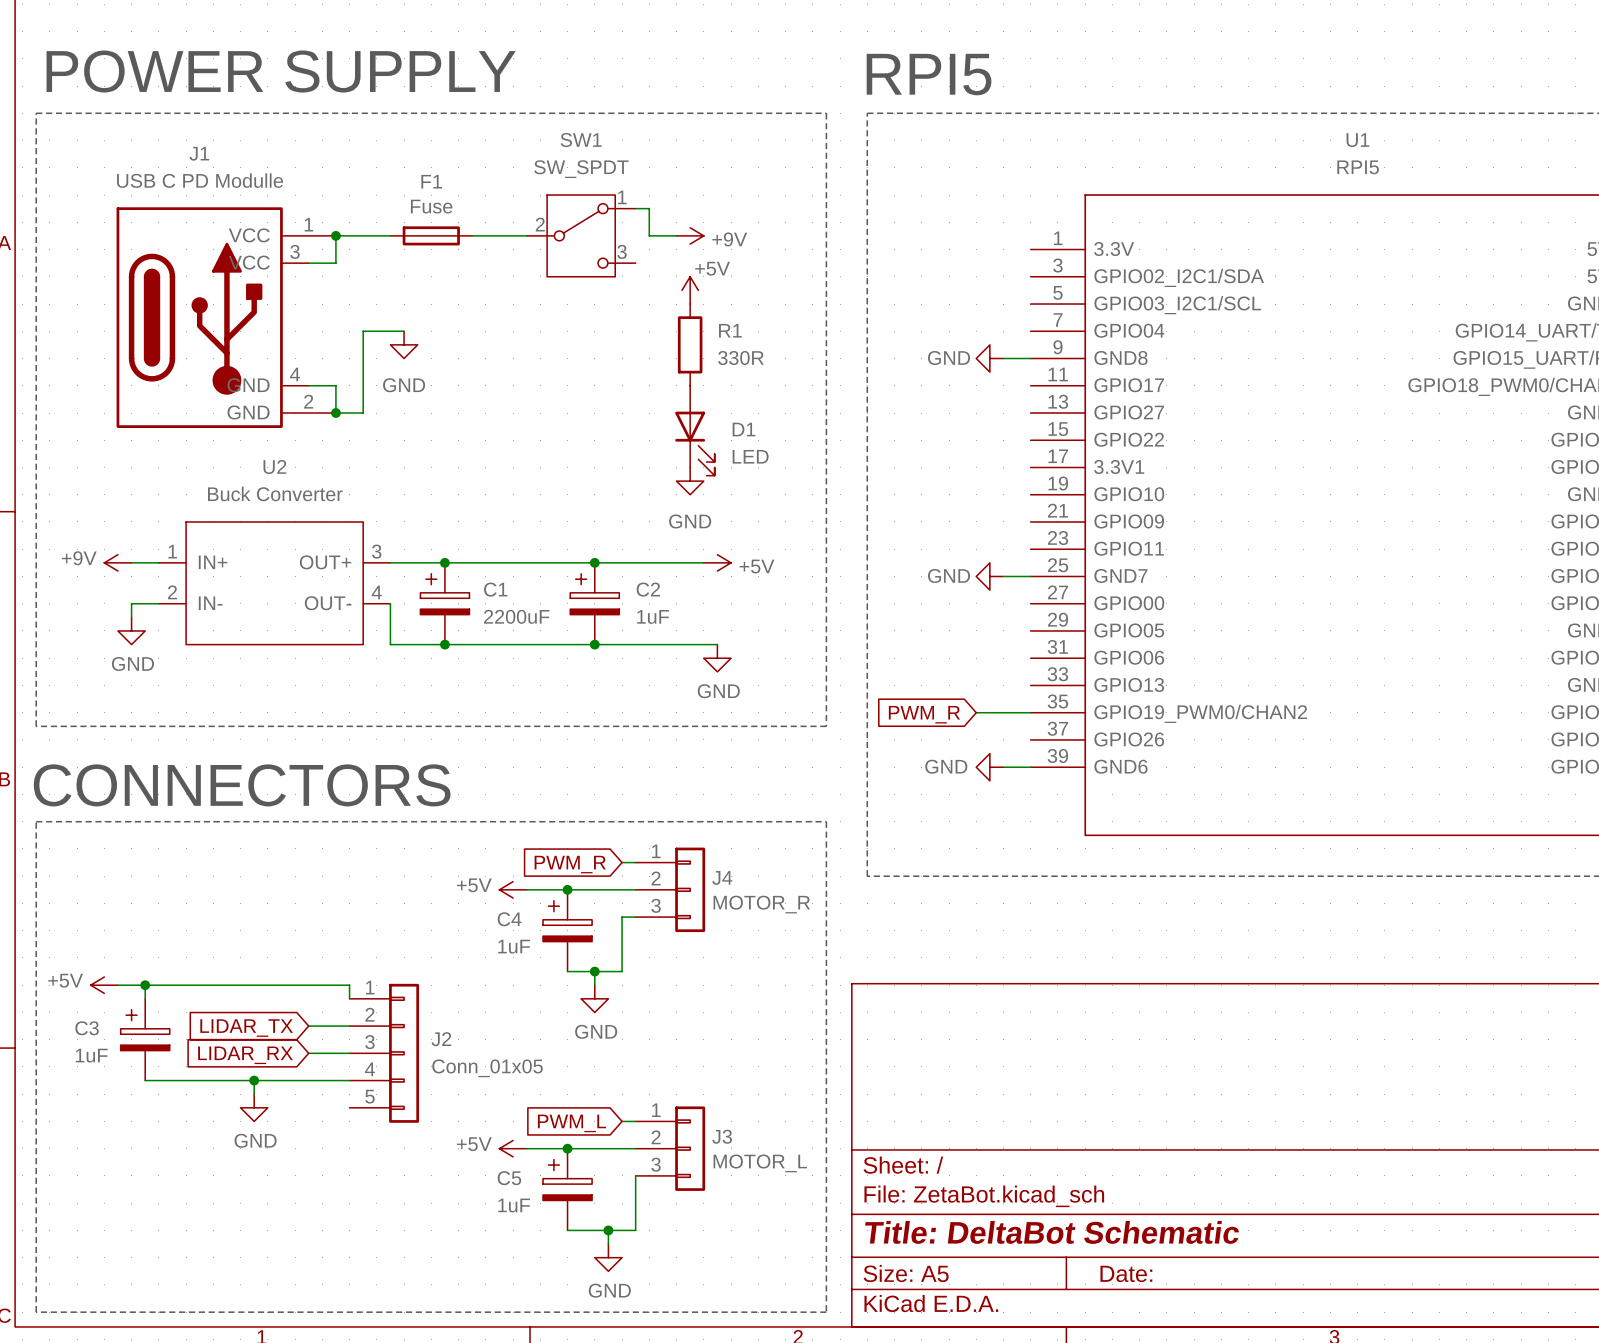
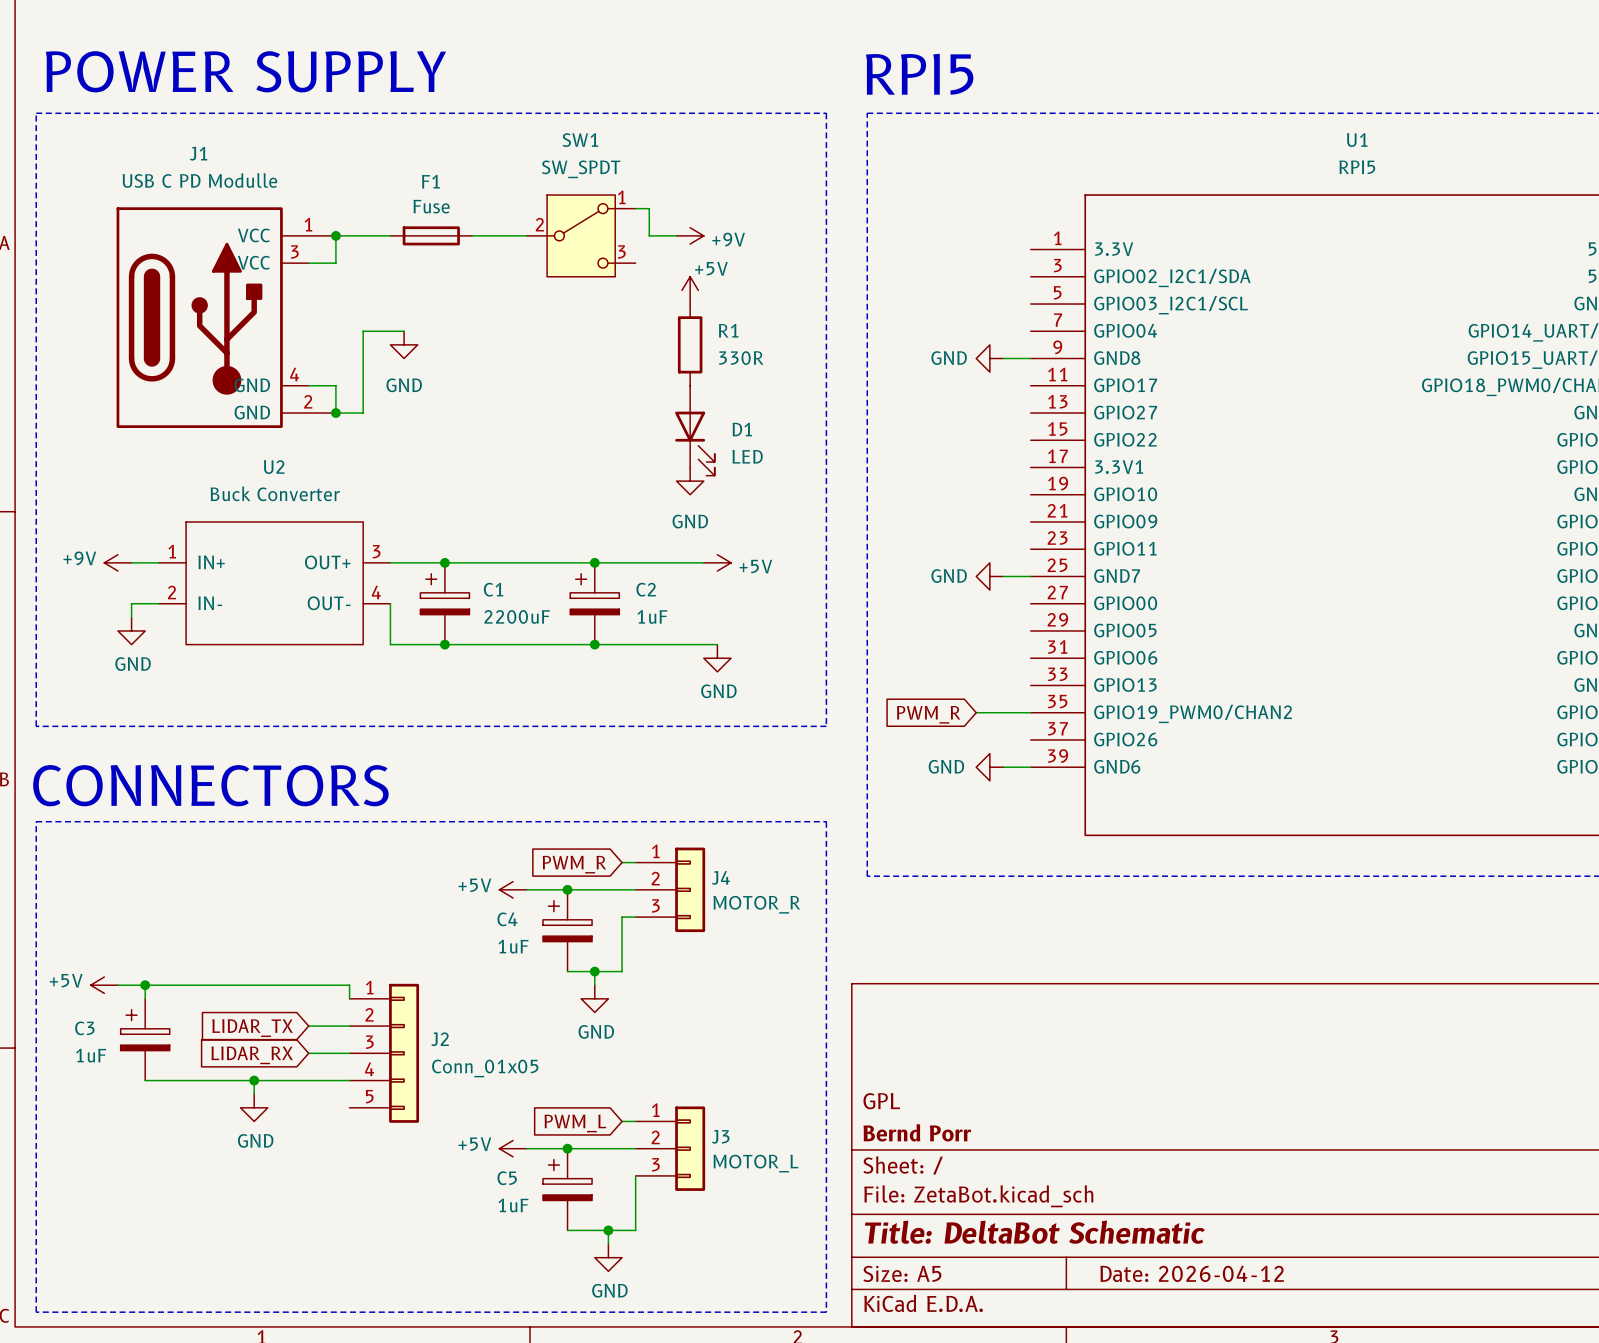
title block: none -> GPL (881, 1101)
title block: none -> Bernd Porr (917, 1132)
title block: Date: (1126, 1273) -> Date: 2026-04-12 (1192, 1273)

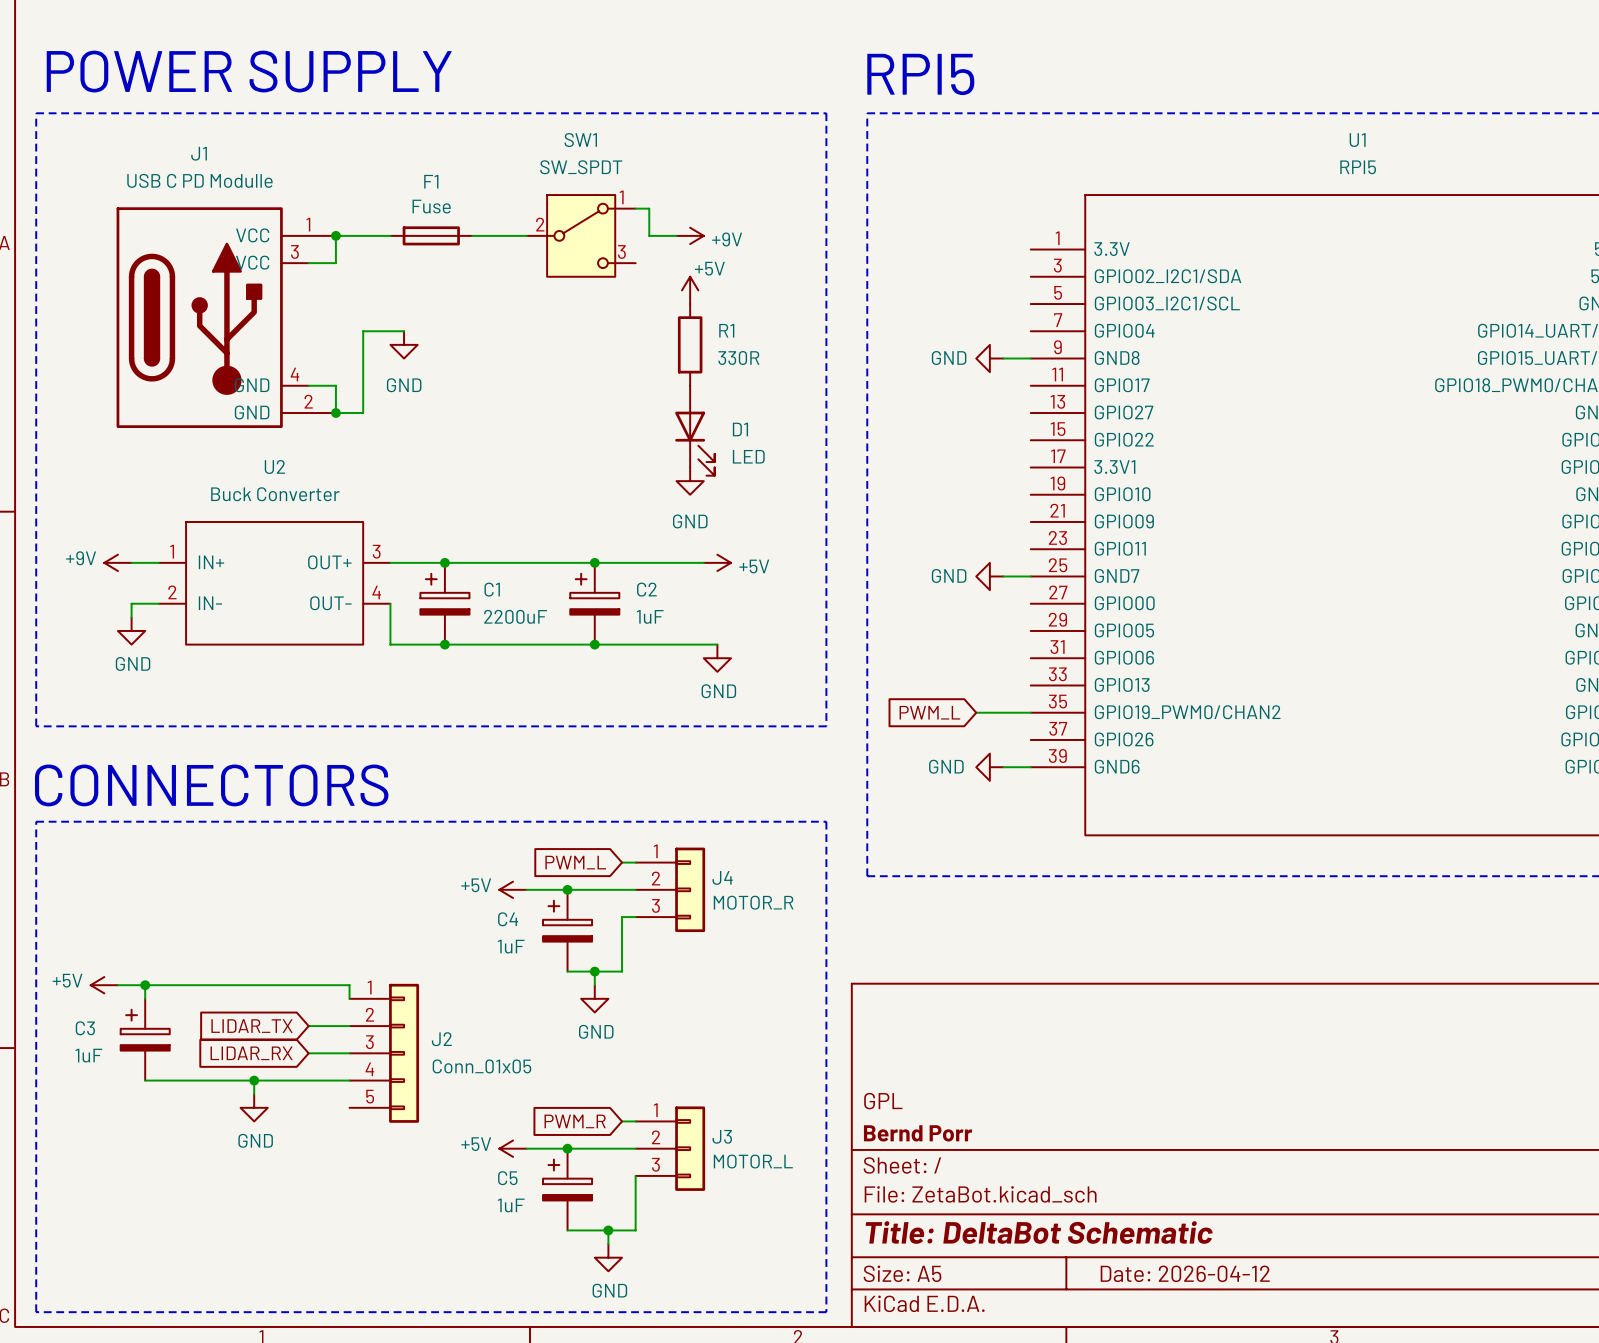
global label: PWM_R (928, 714) -> PWM_L (929, 712)
global label: PWM_R (574, 864) -> PWM_L (575, 862)
global label: PWM_L (575, 1123) -> PWM_R (575, 1121)

